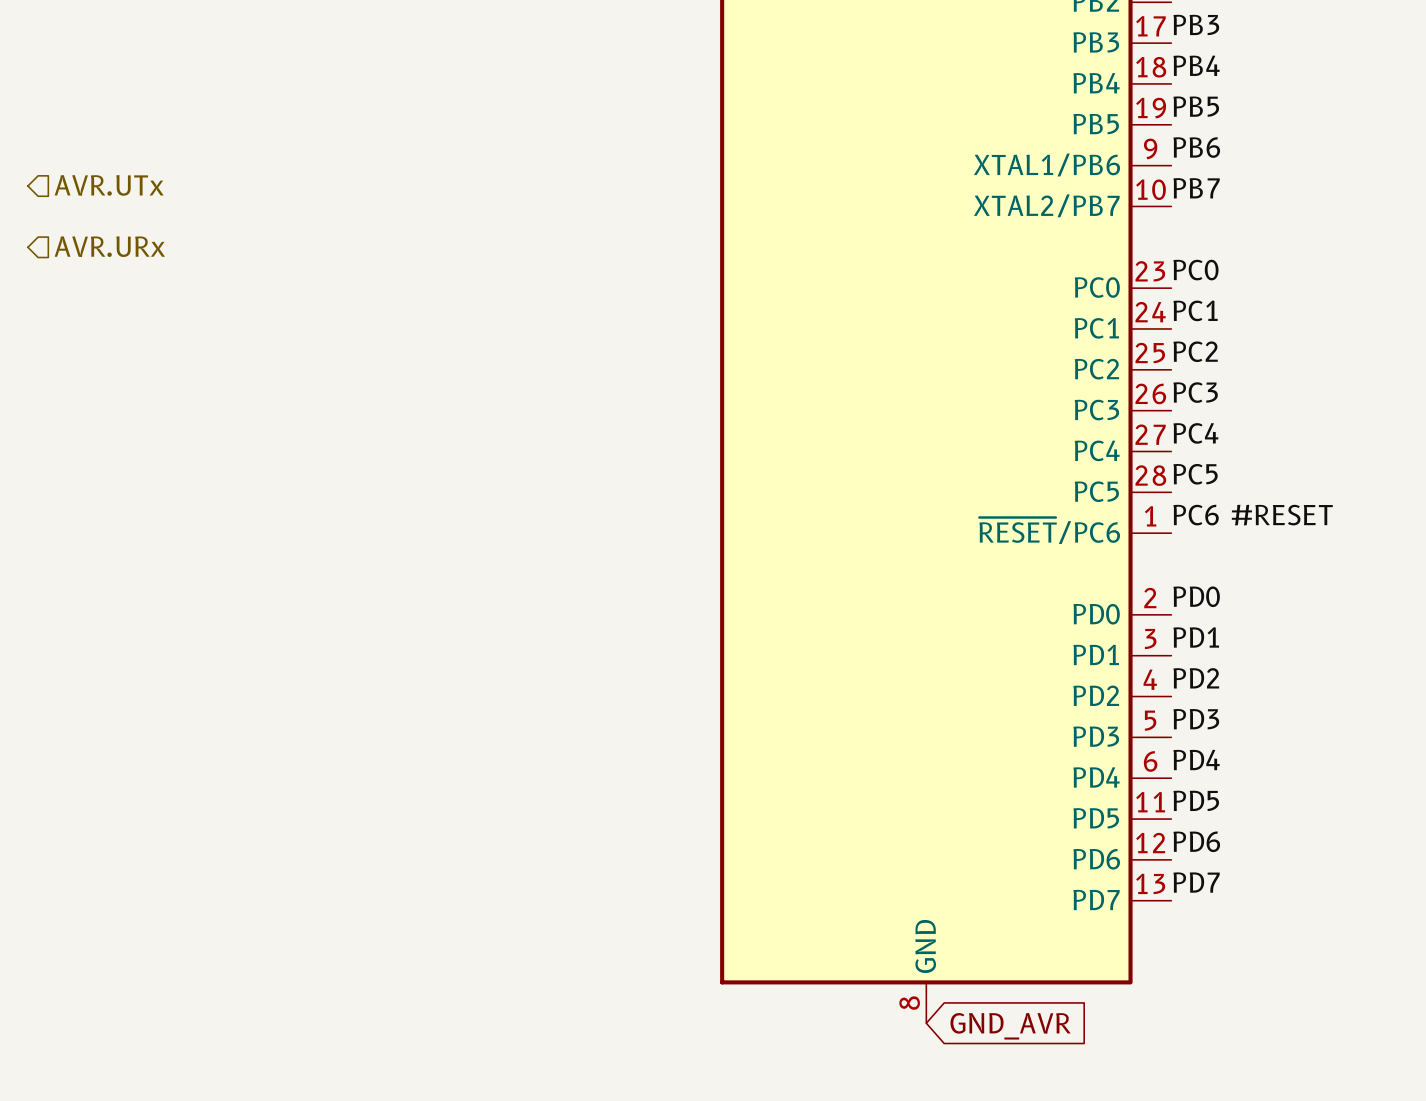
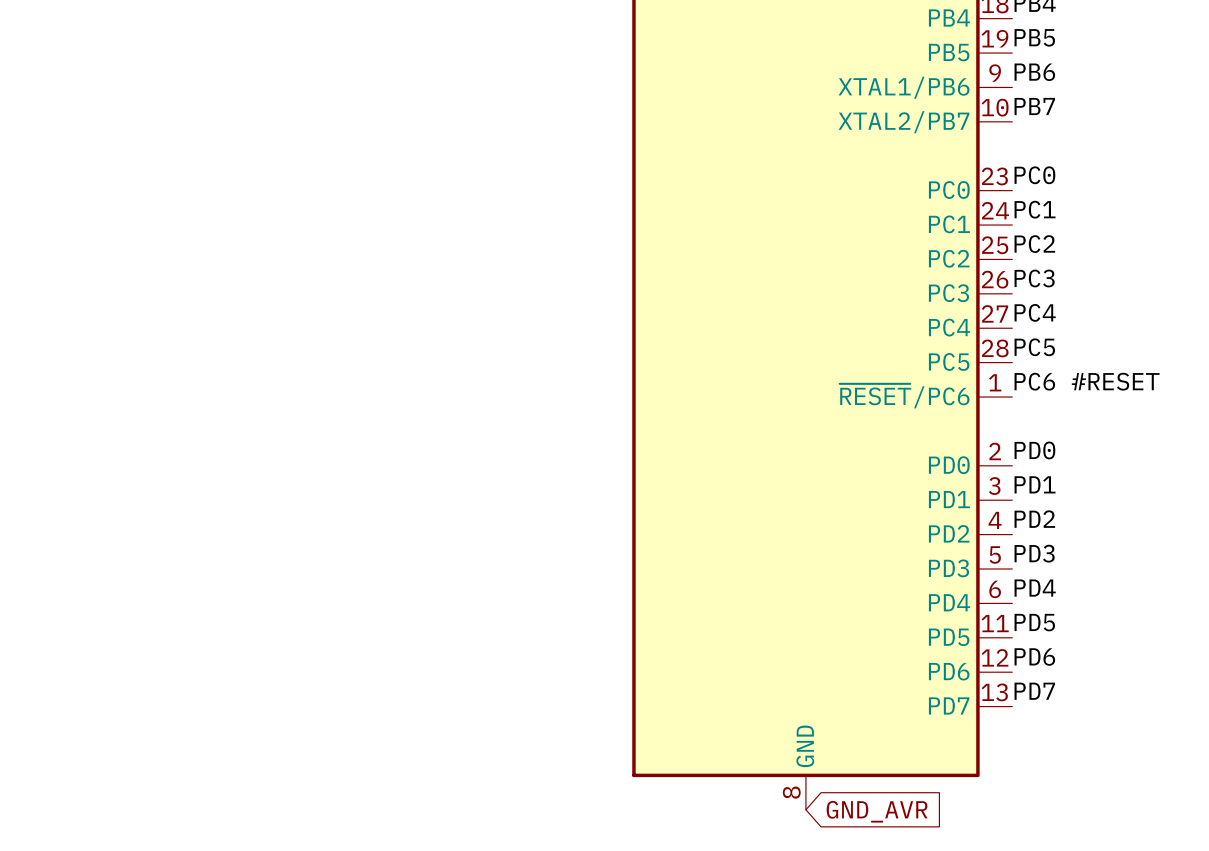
hierarchical label: AVR.UTx (109, 185) -> none
hierarchical label: AVR.URx (109, 246) -> none

